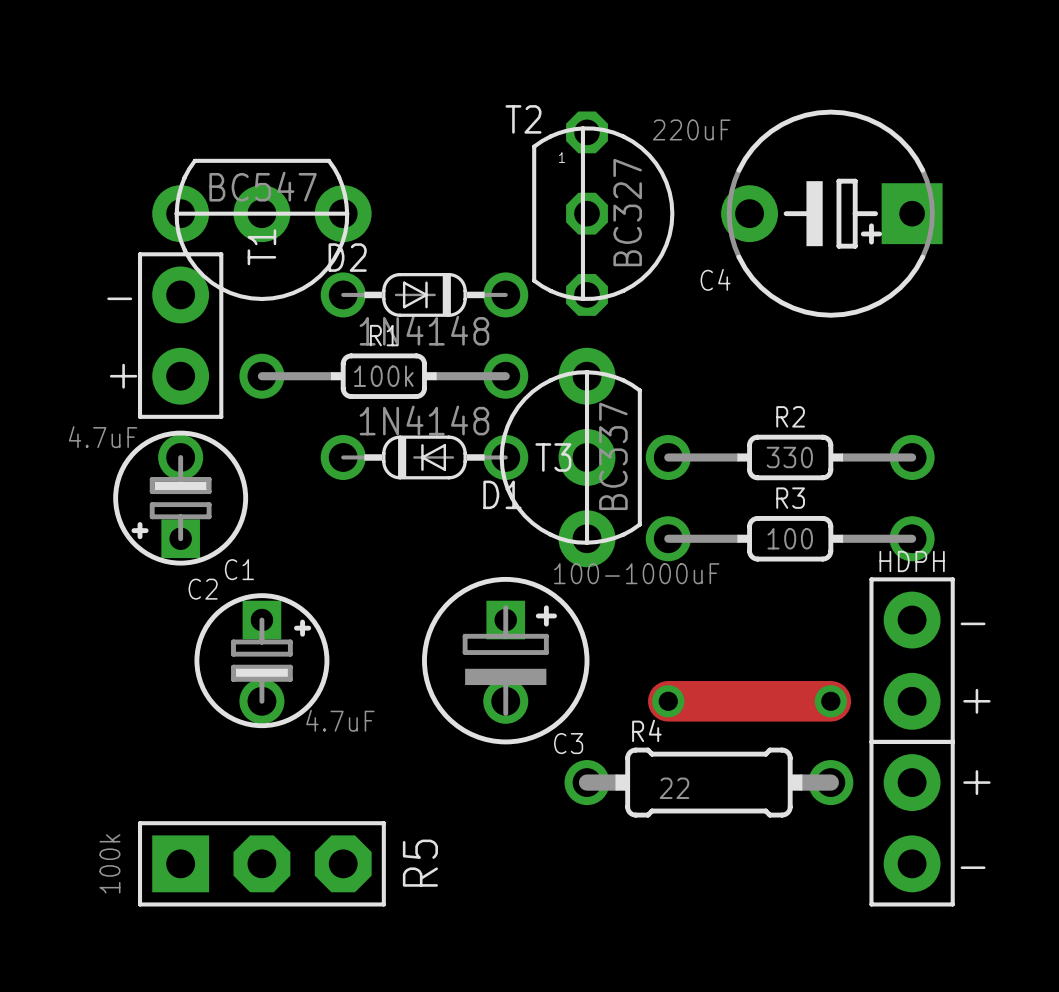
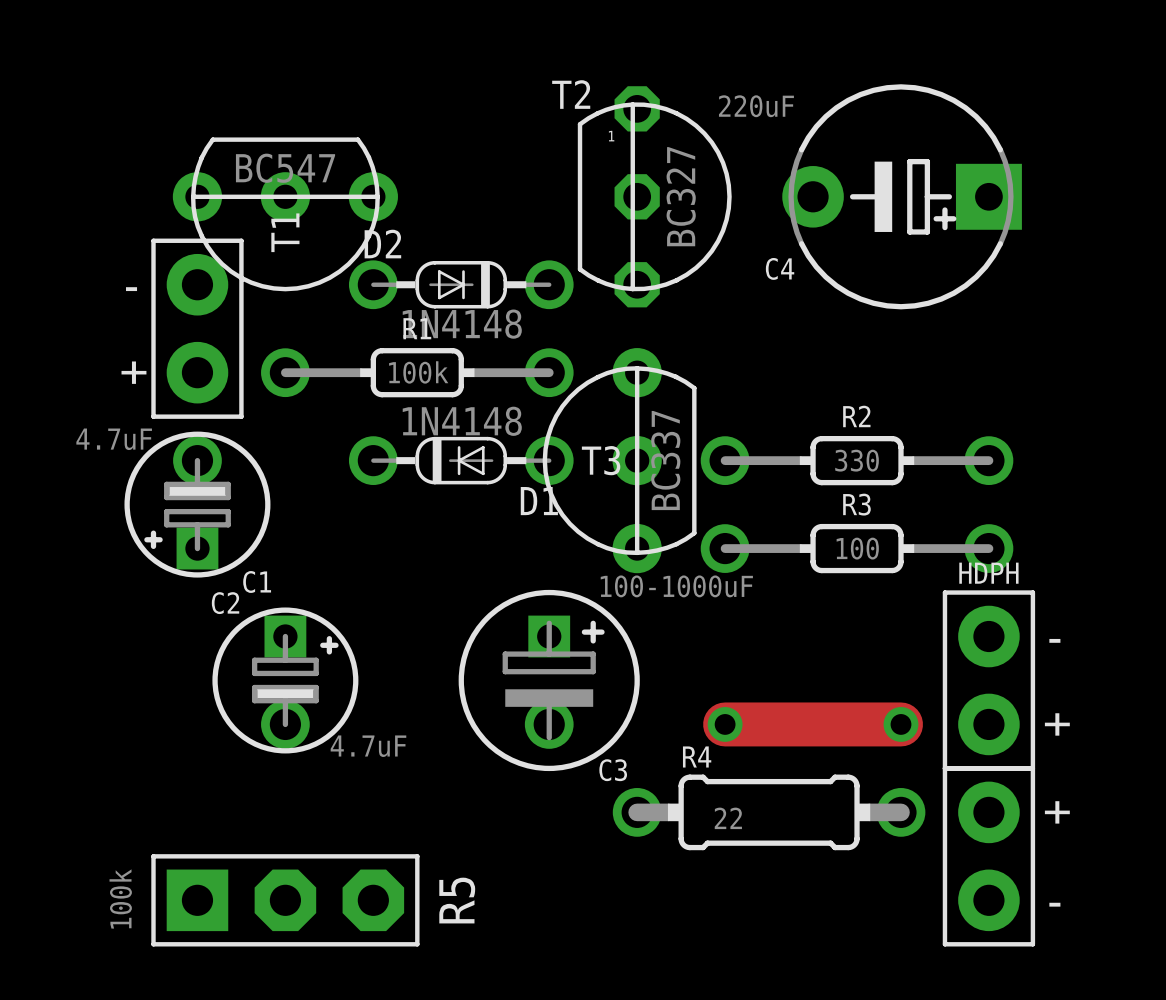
T1 footprint: [152, 158, 372, 302] -> [172, 137, 398, 292]
T3 footprint: [499, 347, 642, 568] -> [542, 348, 697, 574]

